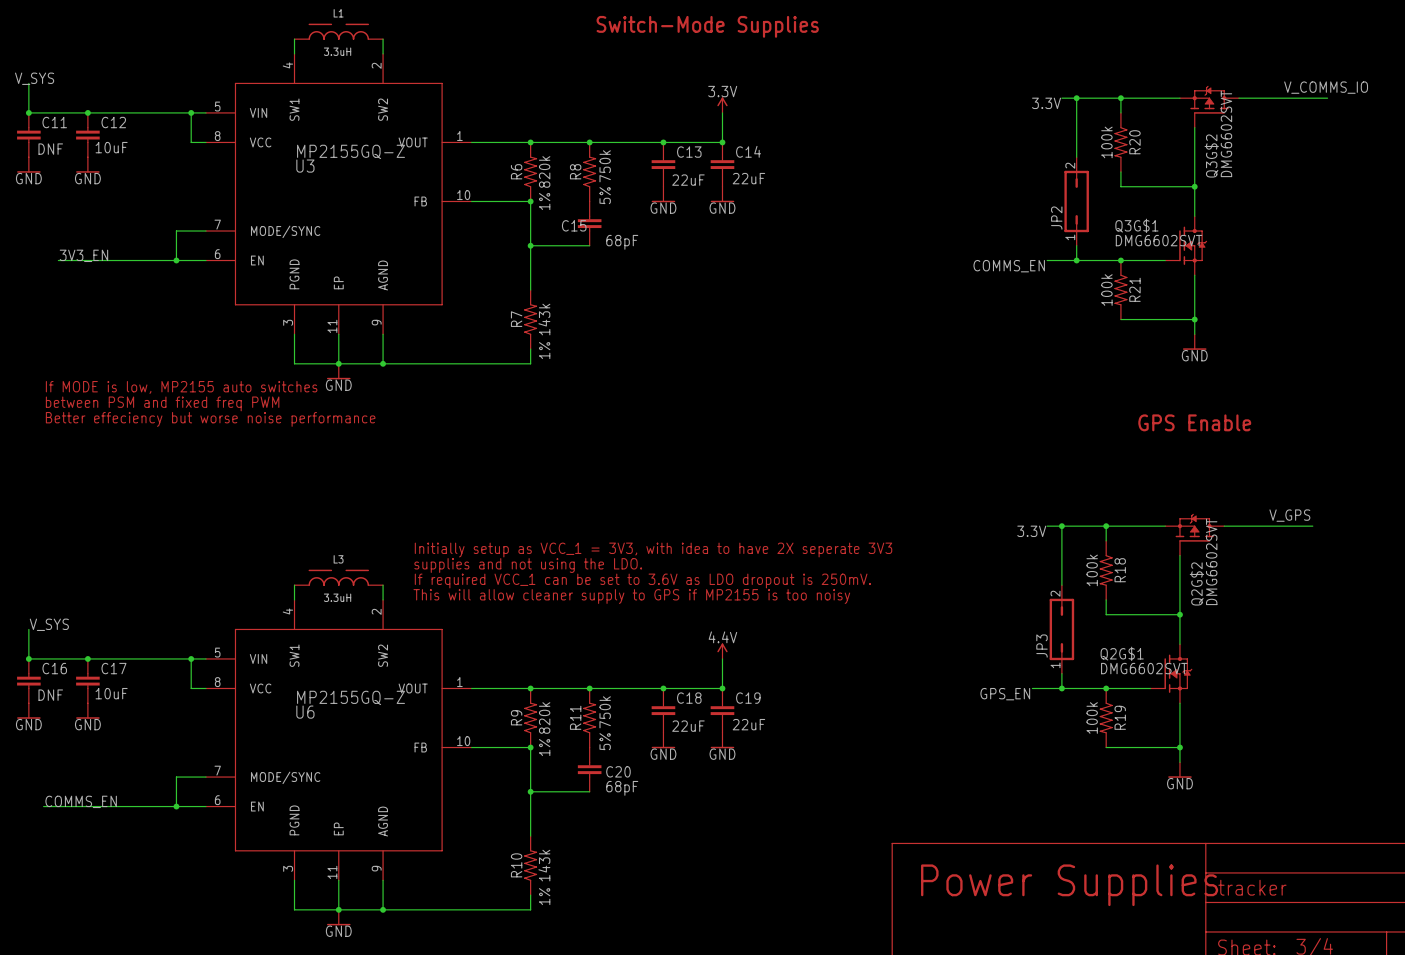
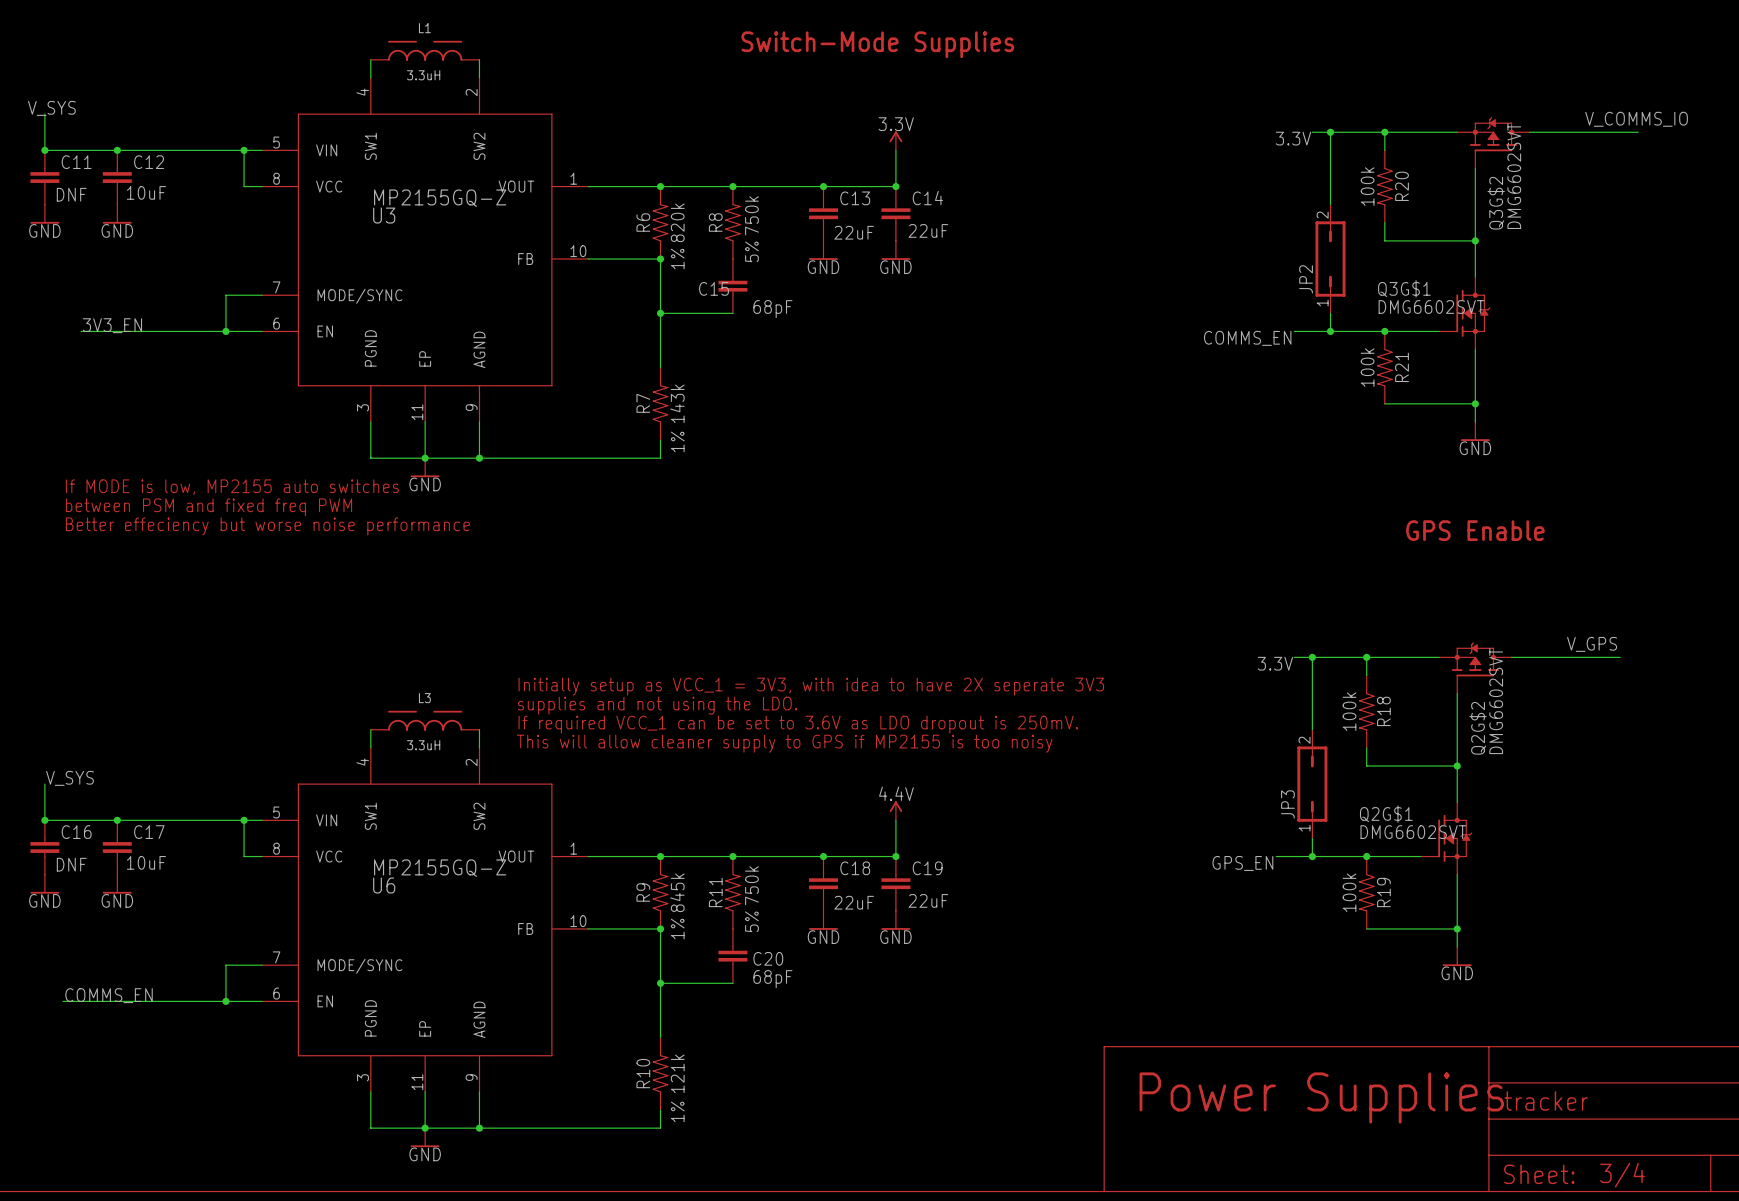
R9 value: 820k (544, 718) -> 845k (677, 892)
R10 value: 143k (544, 865) -> 121k (677, 1073)

